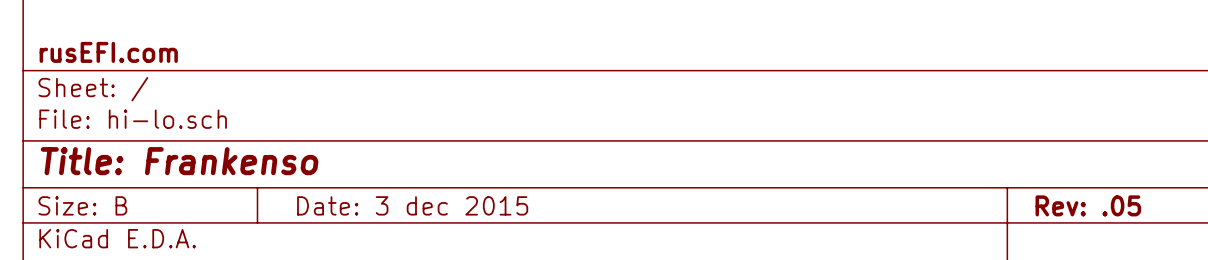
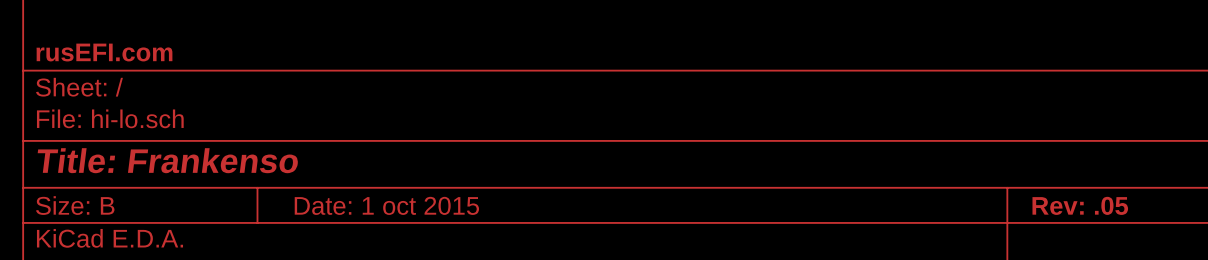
title block: Date: 3 dec 2015 (412, 205) -> Date: 1 oct 2015 (386, 205)

